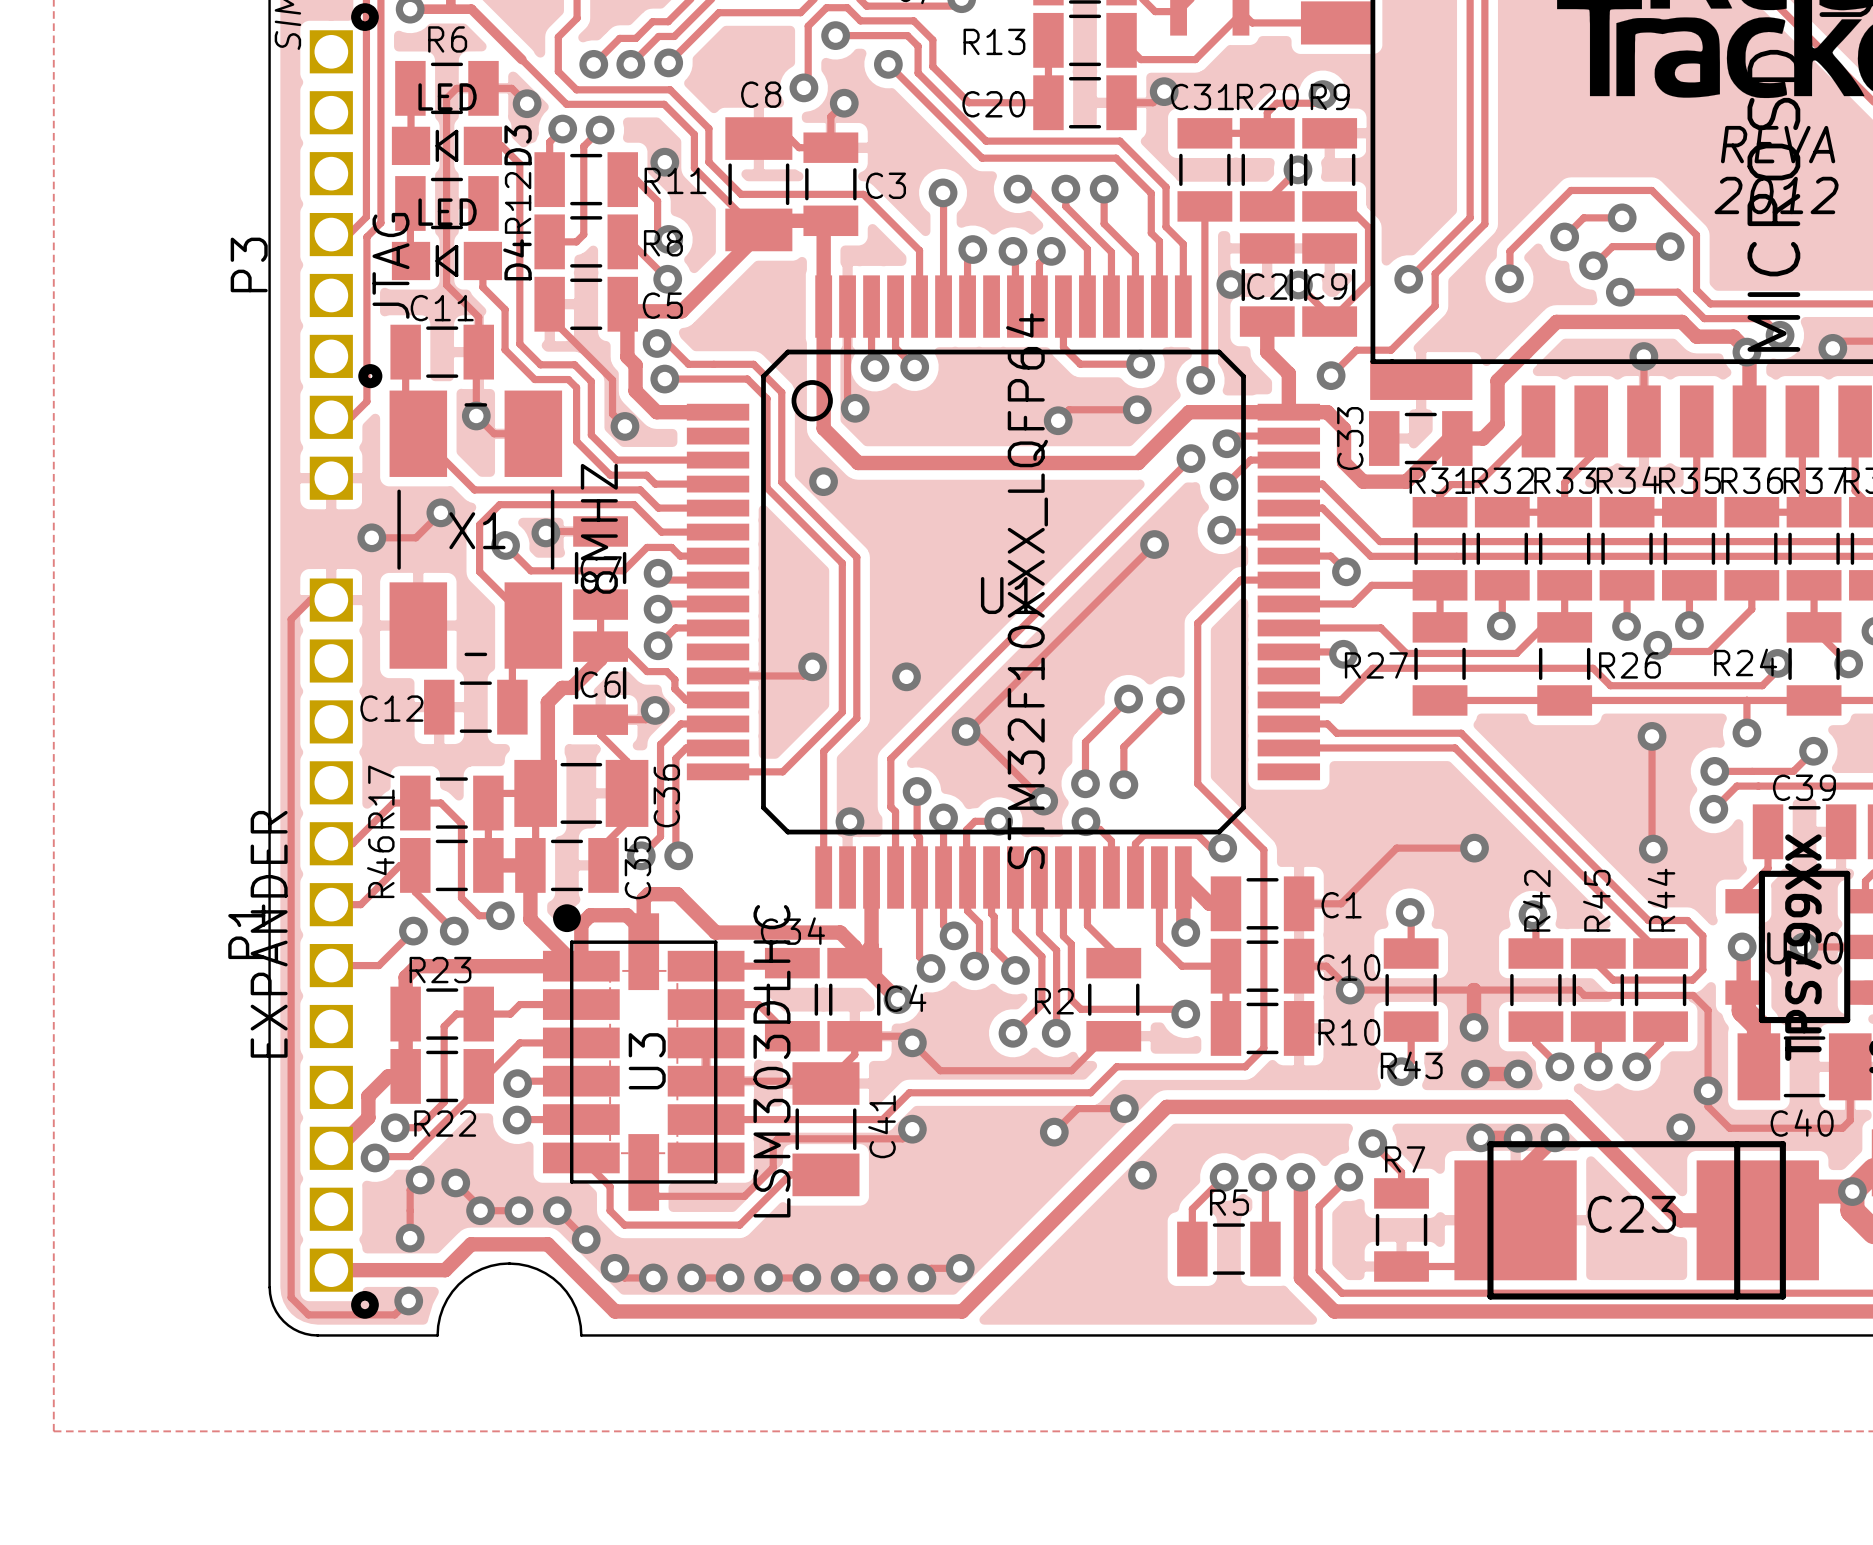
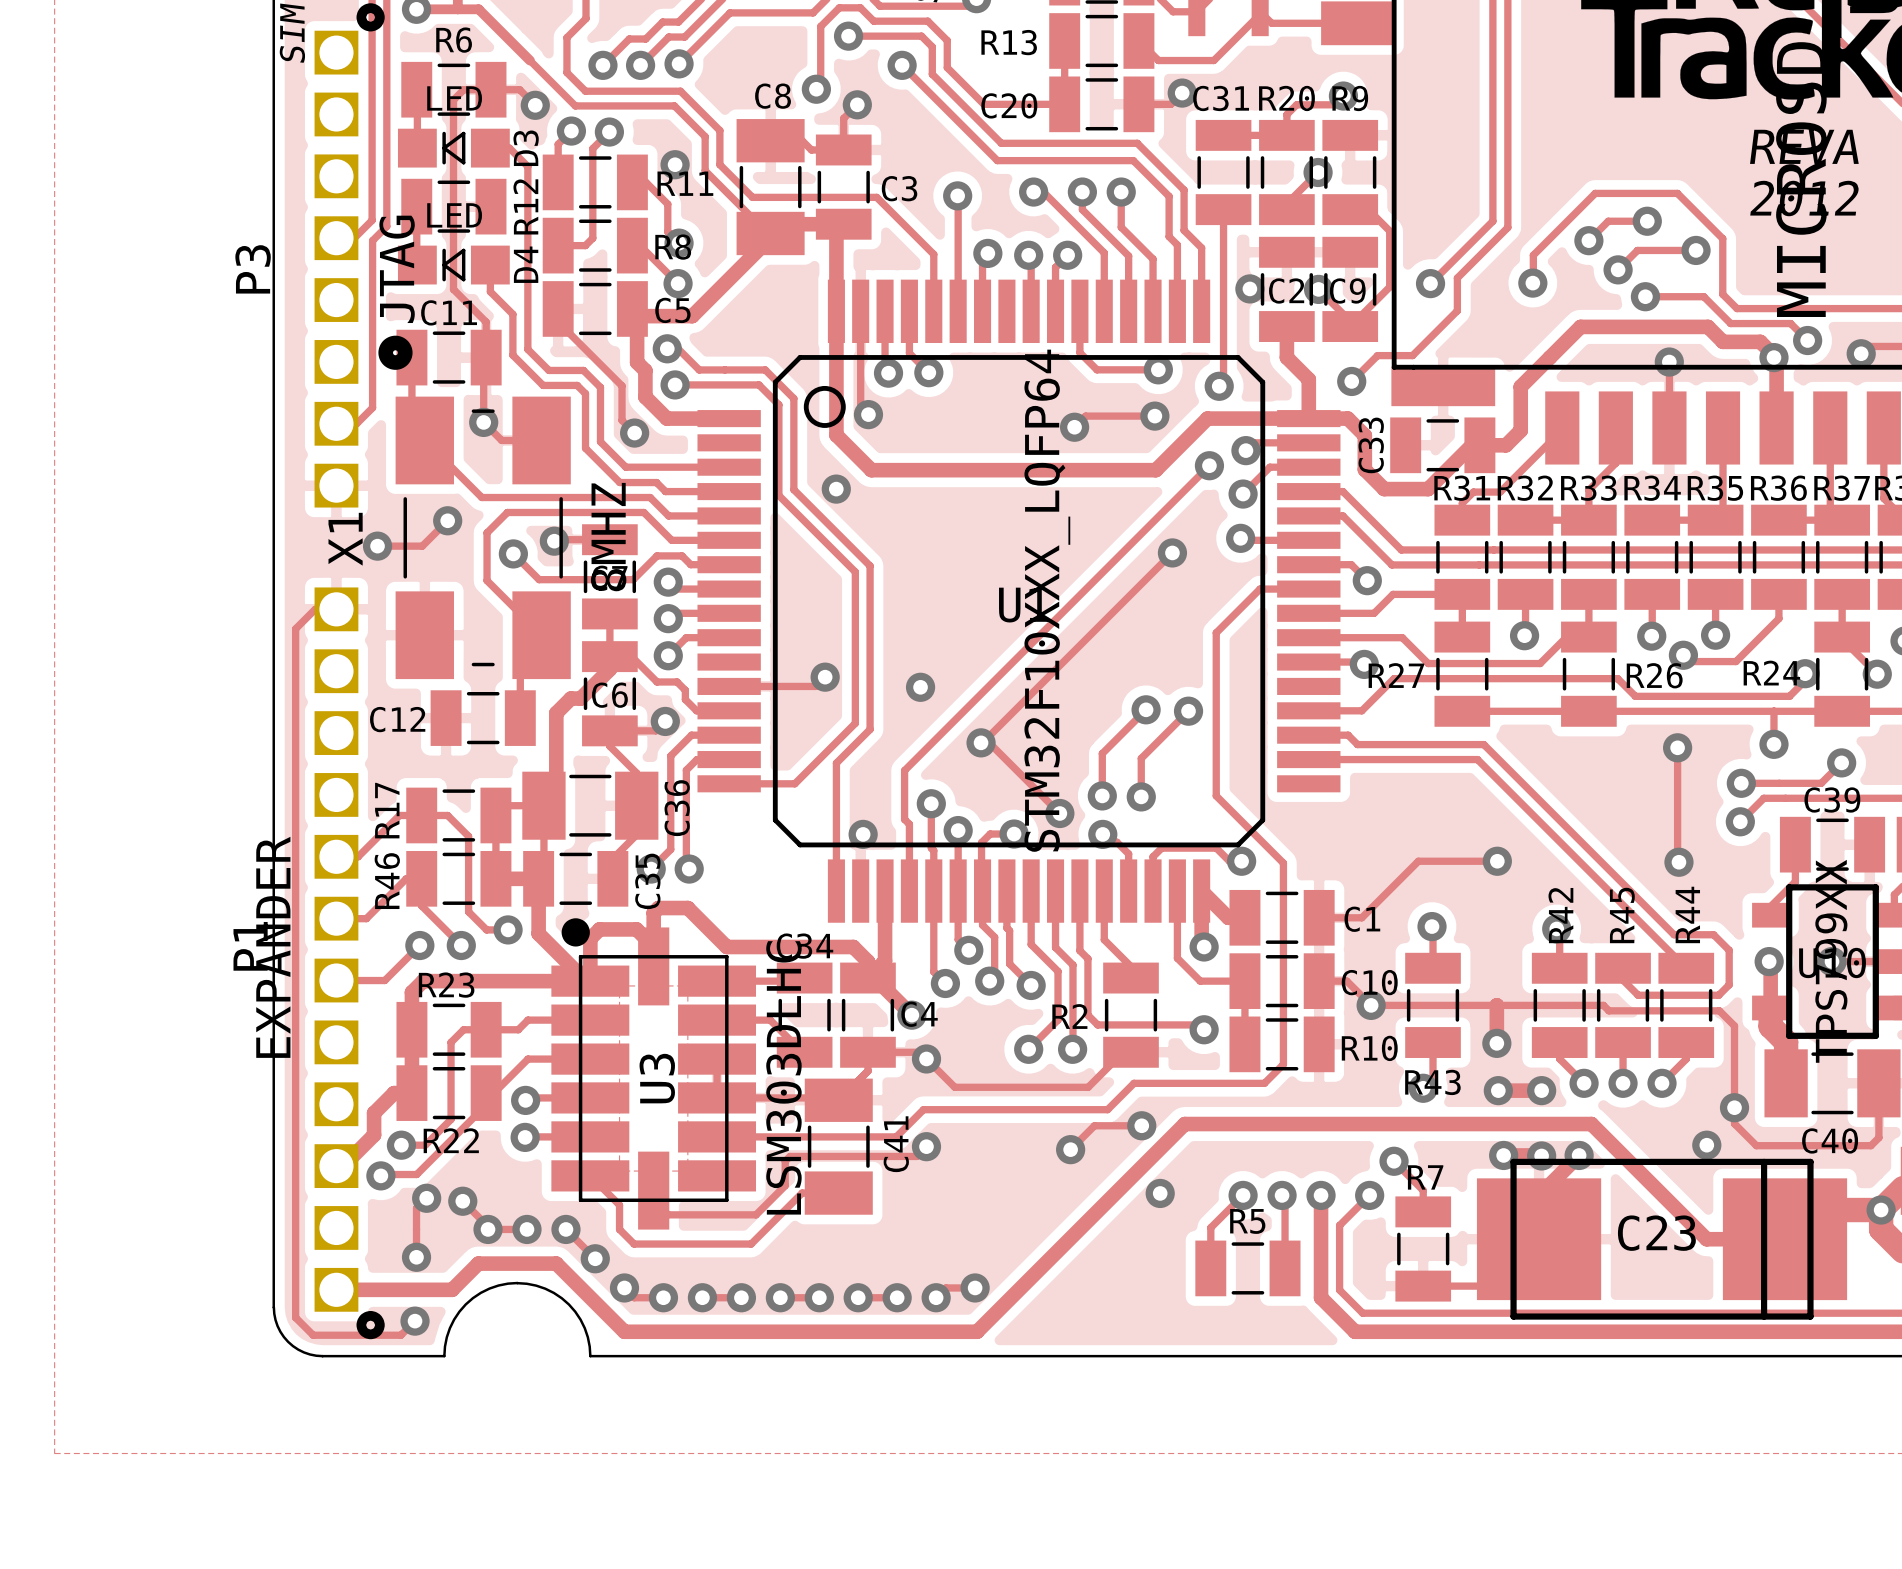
X1 footprint: [358, 364, 563, 669] -> [378, 335, 571, 680]
X1 name rotation: 0° (477, 530) -> 90° counterclockwise (345, 539)
X1 name position: X1 (477, 530) -> X1 (345, 539)

